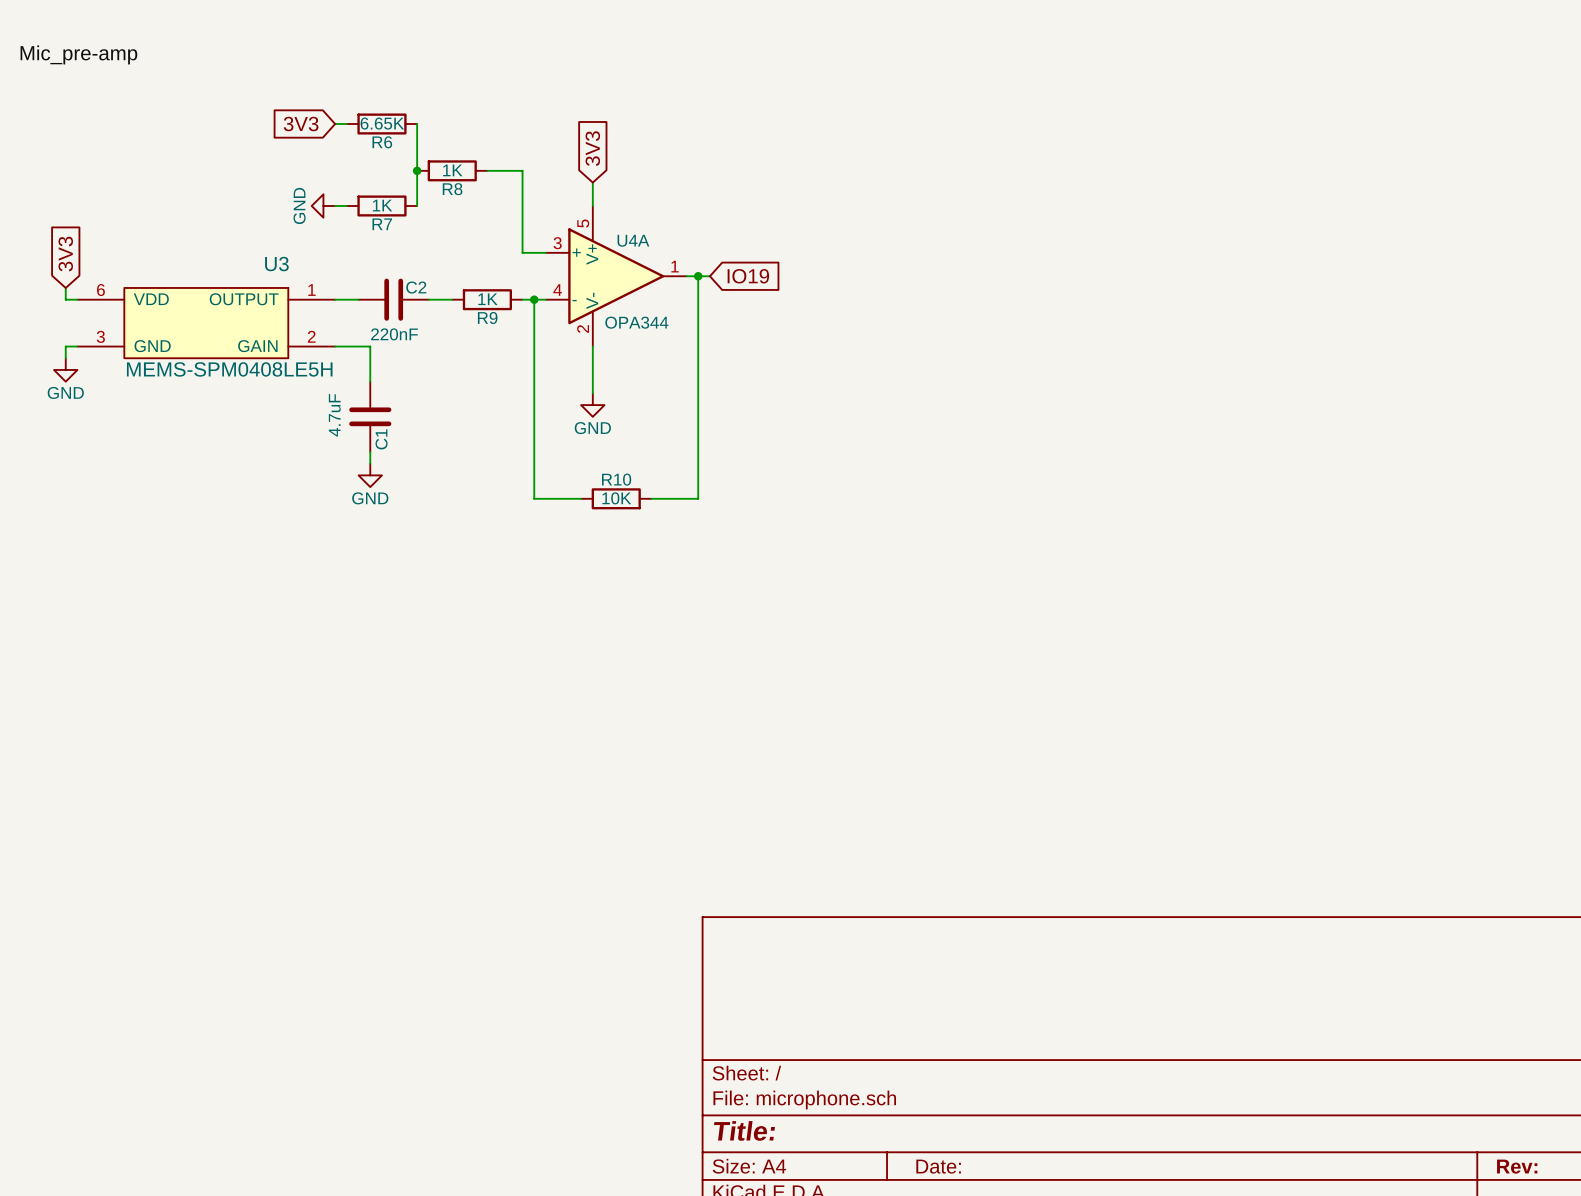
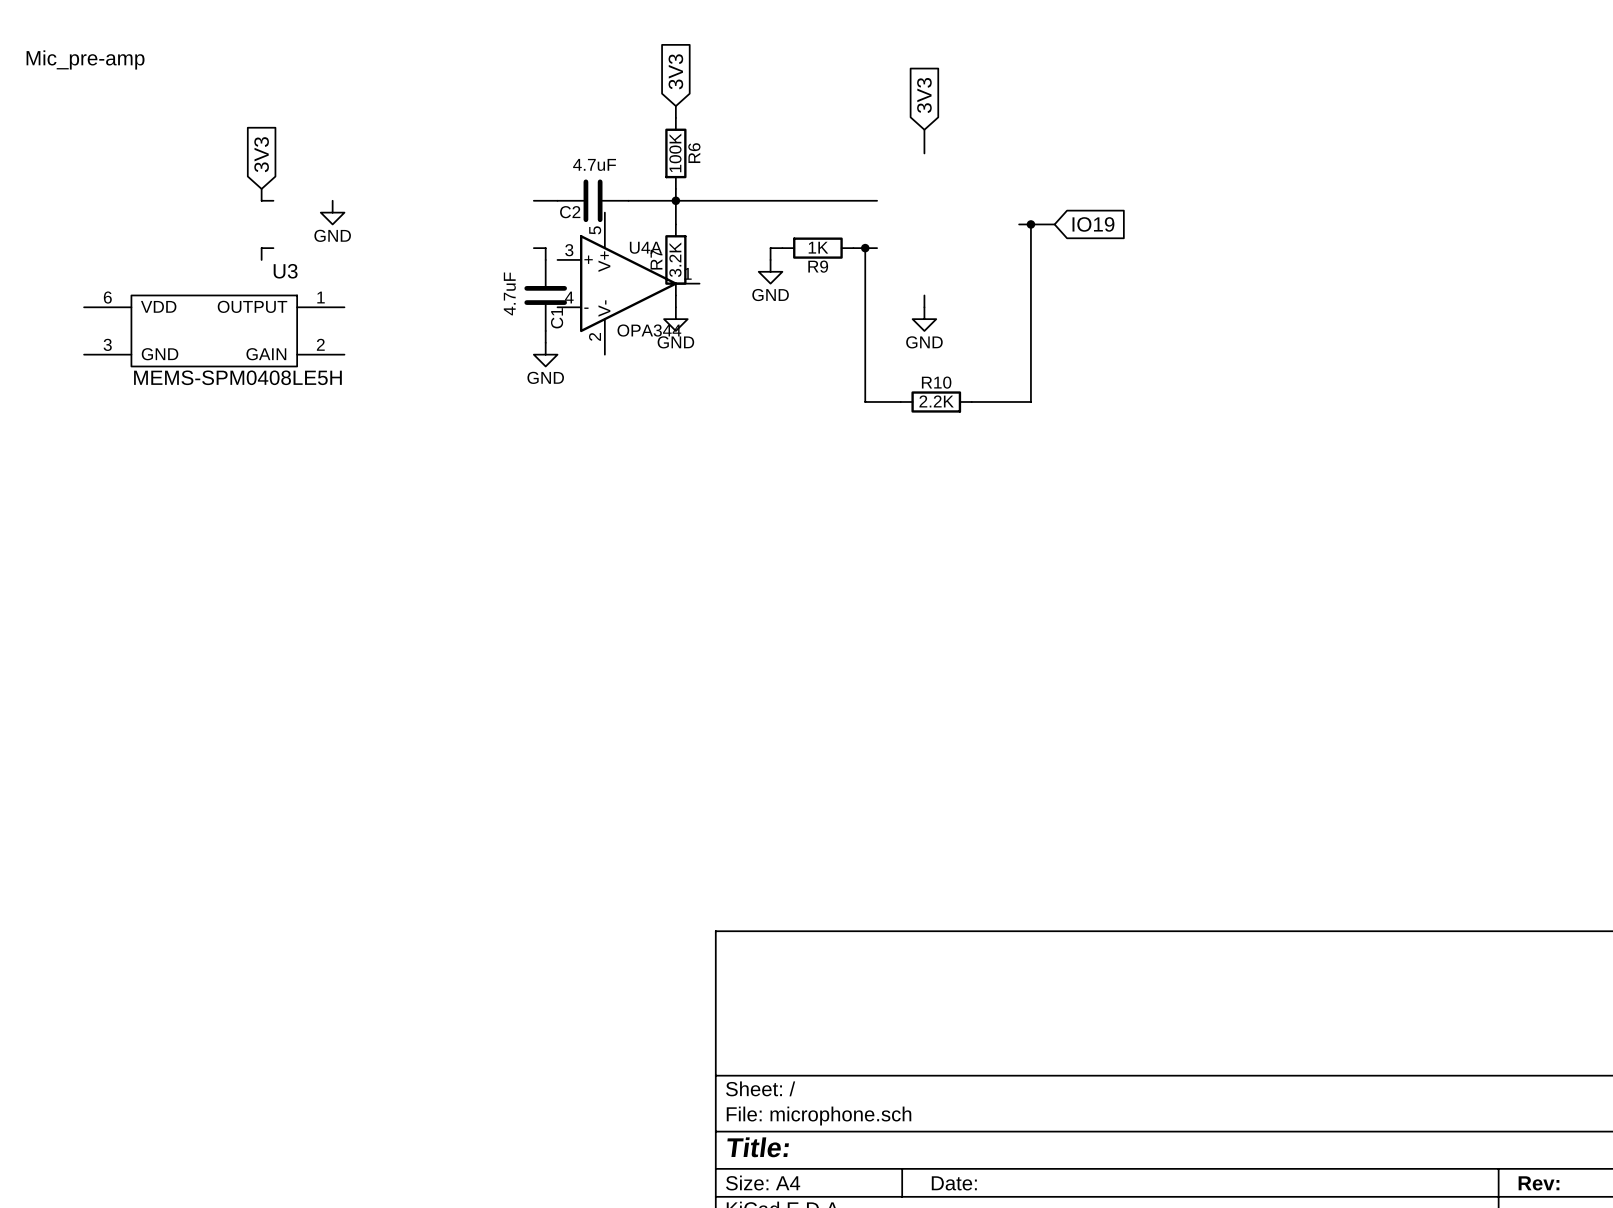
global label: none -> 3V3 (924, 95)
wire: none -> (675, 106) (675, 117)
R6 value: 6.65K (382, 123) -> 100K (675, 152)
global label rotation: 0° (301, 124) -> 90° clockwise (261, 154)
wire: (335, 124) (346, 124) -> none
R6 rotation: 0° (381, 124) -> 90° clockwise (675, 153)
R6 position: (381, 124) -> (675, 153)
wire: (417, 124) (417, 205) -> none
wire: none -> (924, 129) (924, 153)
R6 name position: R6 (382, 142) -> R6 (694, 153)
global label position: 3V3 (592, 148) -> 3V3 (675, 71)
junction: (417, 170) -> none
R8: 1K (452, 170) -> none
wire: (487, 170) (522, 170) (522, 252) (545, 252) -> none
wire: (592, 182) (592, 205) -> none
wire: none -> (675, 188) (675, 224)
wire: none -> (628, 200) (877, 200)
junction: none -> (675, 200)
power symbol rotation: 0° (323, 205) -> 90° counterclockwise (332, 212)
wire: (335, 205) (346, 205) -> none
R7 rotation: 0° (381, 205) -> 90° clockwise (675, 259)
R7 position: (381, 205) -> (675, 259)
R7 value: 1K (382, 205) -> 3.2K (675, 259)
wire: none -> (1019, 224) (1054, 224)
wire: none -> (1030, 224) (1030, 401) (971, 401)
junction: none -> (1030, 224)
global label: none -> IO19 (1093, 224)
wire: none -> (533, 248) (545, 248) (545, 259)
wire: none -> (782, 248) (770, 248) (770, 259)
wire: none -> (865, 248) (865, 401) (900, 401)
junction: none -> (865, 248)
global label: 3V3 (65, 254) -> none
power symbol: none -> GND (770, 271)
wire: (686, 276) (709, 276) -> (853, 248) (877, 248)
wire: (698, 276) (698, 498) (651, 498) -> none
junction: (698, 276) -> none
global label: IO19 (748, 276) -> none
wire: (65, 287) (65, 299) (77, 299) -> (261, 188) (261, 200) (273, 200)
C2 name position: C2 (416, 287) -> C2 (570, 212)
wire: none -> (675, 295) (675, 307)
wire: none -> (924, 295) (924, 307)
wire: (335, 299) (358, 299) -> (533, 200) (557, 200)
C2 position: (393, 299) -> (593, 200)
wire: (428, 299) (452, 299) -> none
R9 position: (487, 299) -> (817, 248)
wire: (522, 299) (545, 299) -> none
junction: (534, 299) -> none
power symbol: none -> GND (675, 319)
power symbol: none -> GND (924, 319)
C2 value: 220nF (394, 334) -> 4.7uF (594, 164)
wire: (534, 334) (534, 498) (581, 498) -> none
wire: (77, 346) (65, 346) (65, 358) -> (273, 248) (261, 248) (261, 259)
wire: (335, 346) (370, 346) (370, 381) -> none
power symbol: none -> GND (545, 354)
wire: (592, 346) (592, 393) -> none
power symbol: GND (65, 369) -> none
power symbol: GND (592, 405) -> none
C1 position: (370, 416) -> (545, 295)
wire: (370, 451) (370, 463) -> none
power symbol: GND (370, 475) -> none
R10 position: (616, 498) -> (936, 401)
R10 value: 10K (616, 498) -> 2.2K (936, 401)

